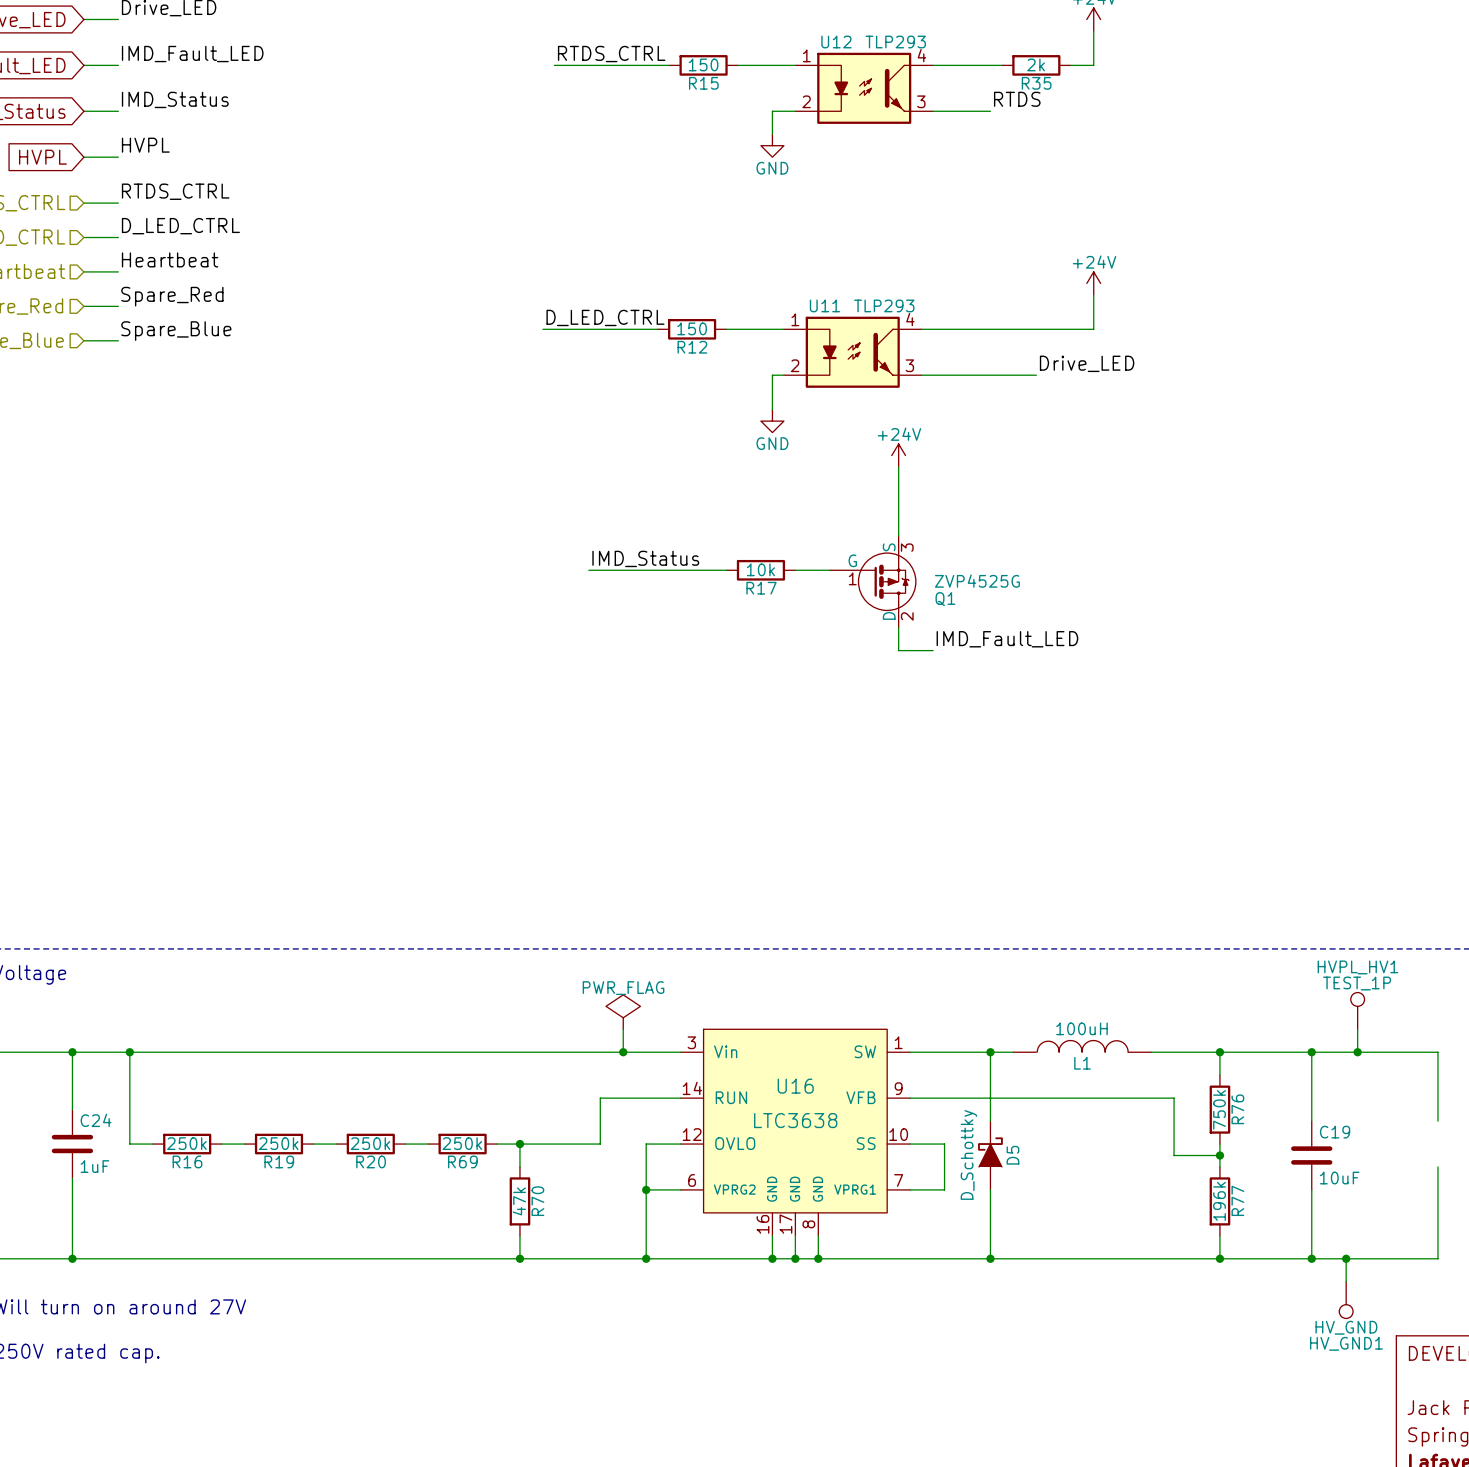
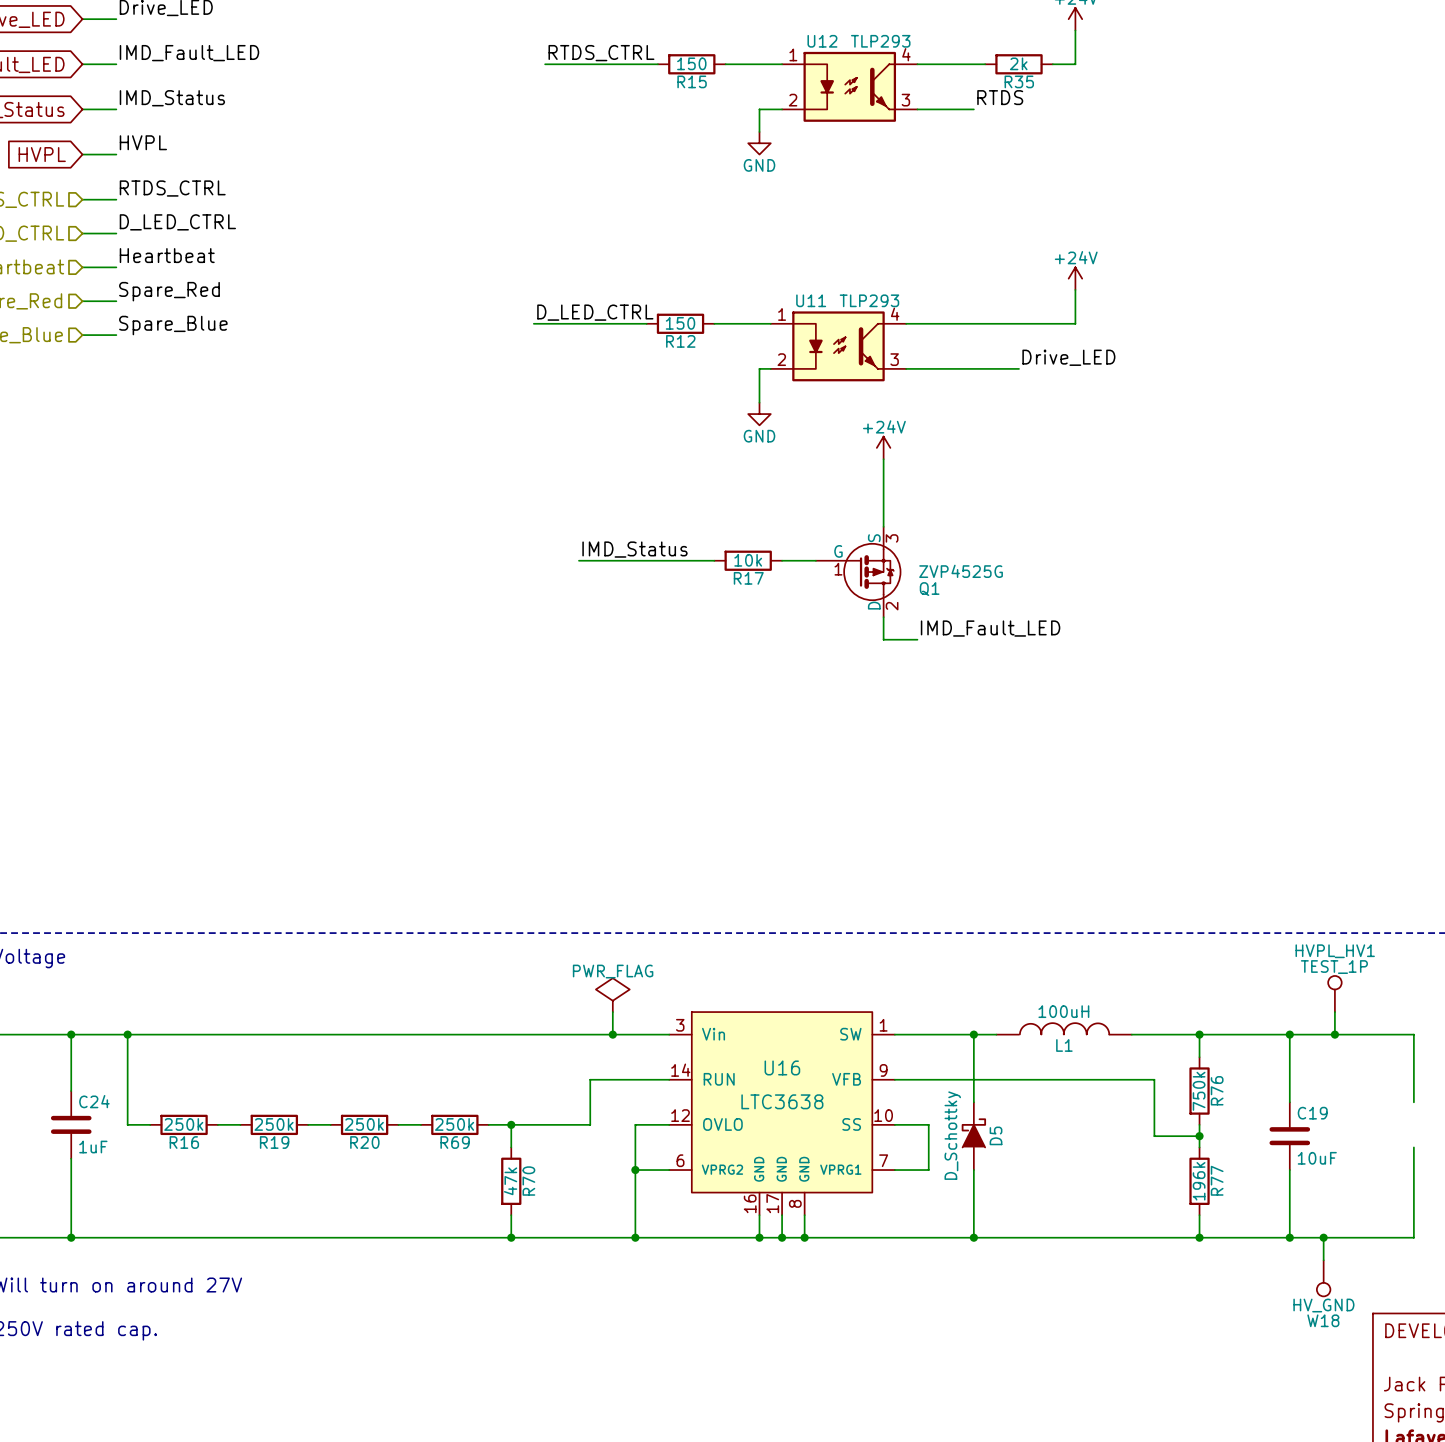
HV_GND1 name: HV_GND1 (1346, 1343) -> W18 (1323, 1320)

